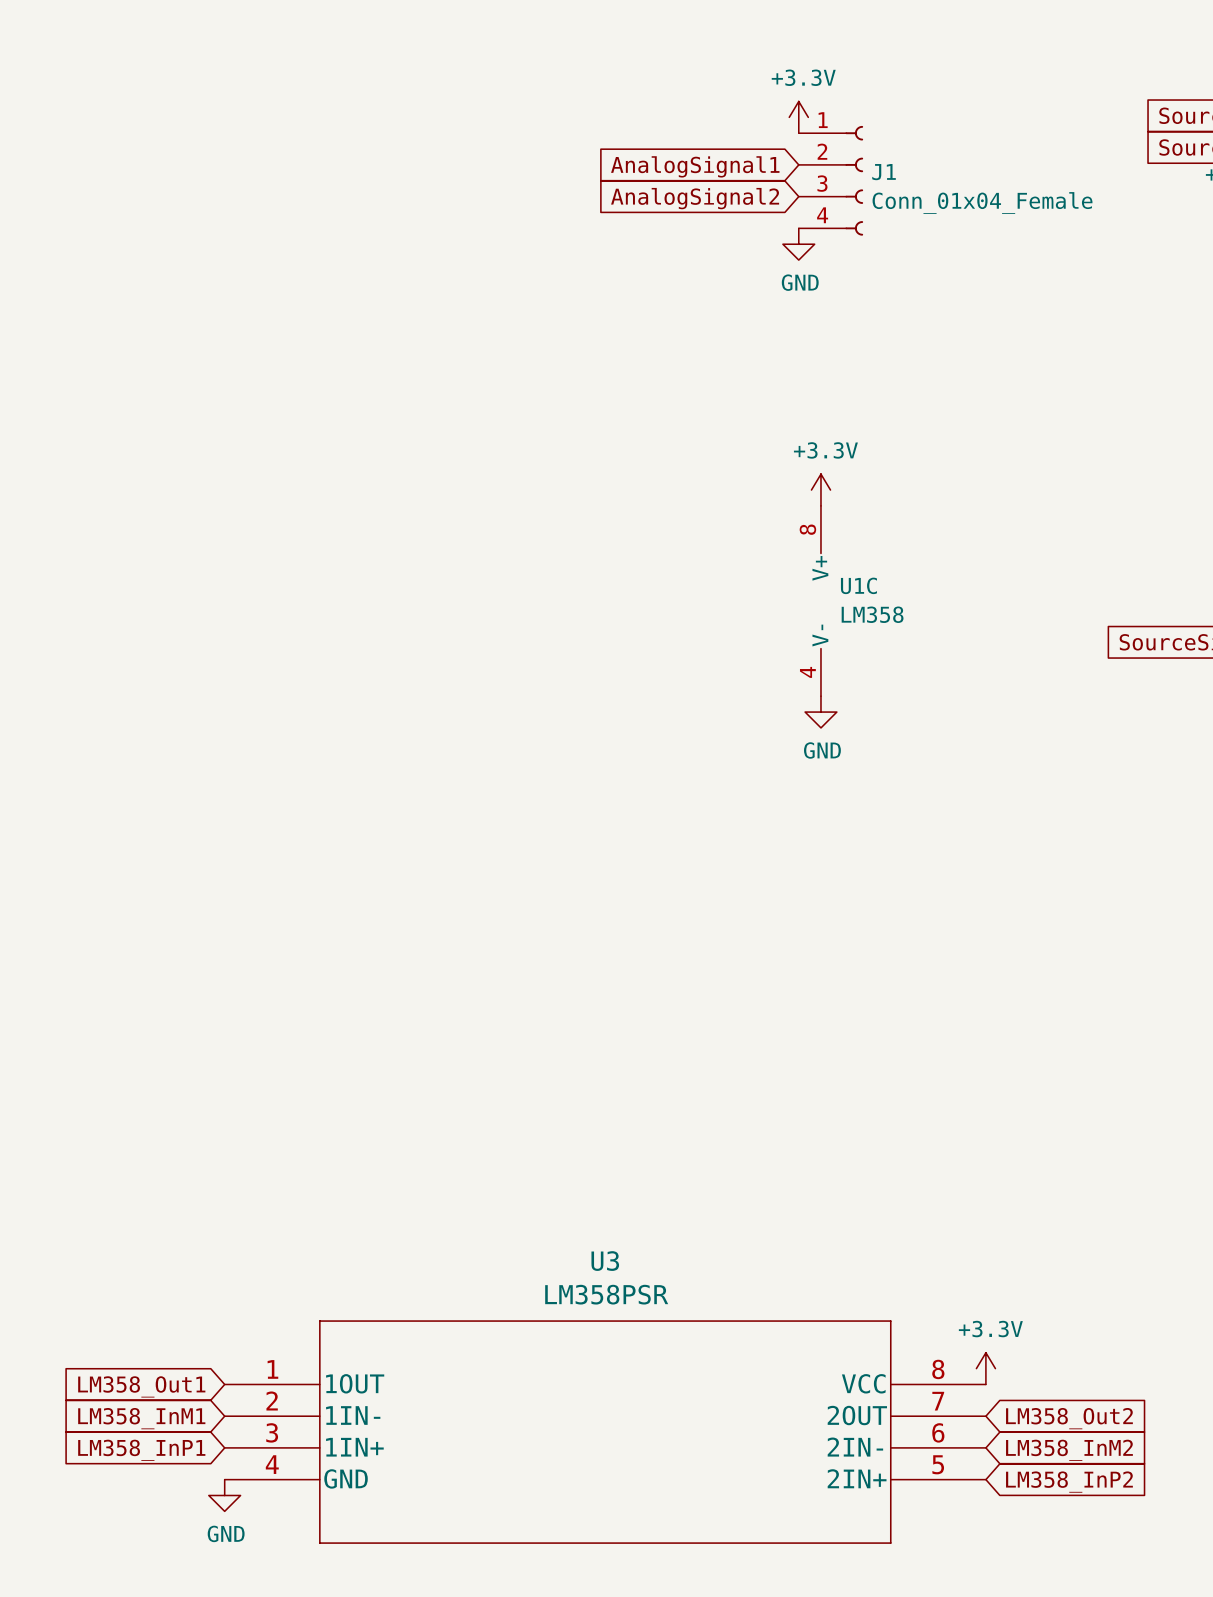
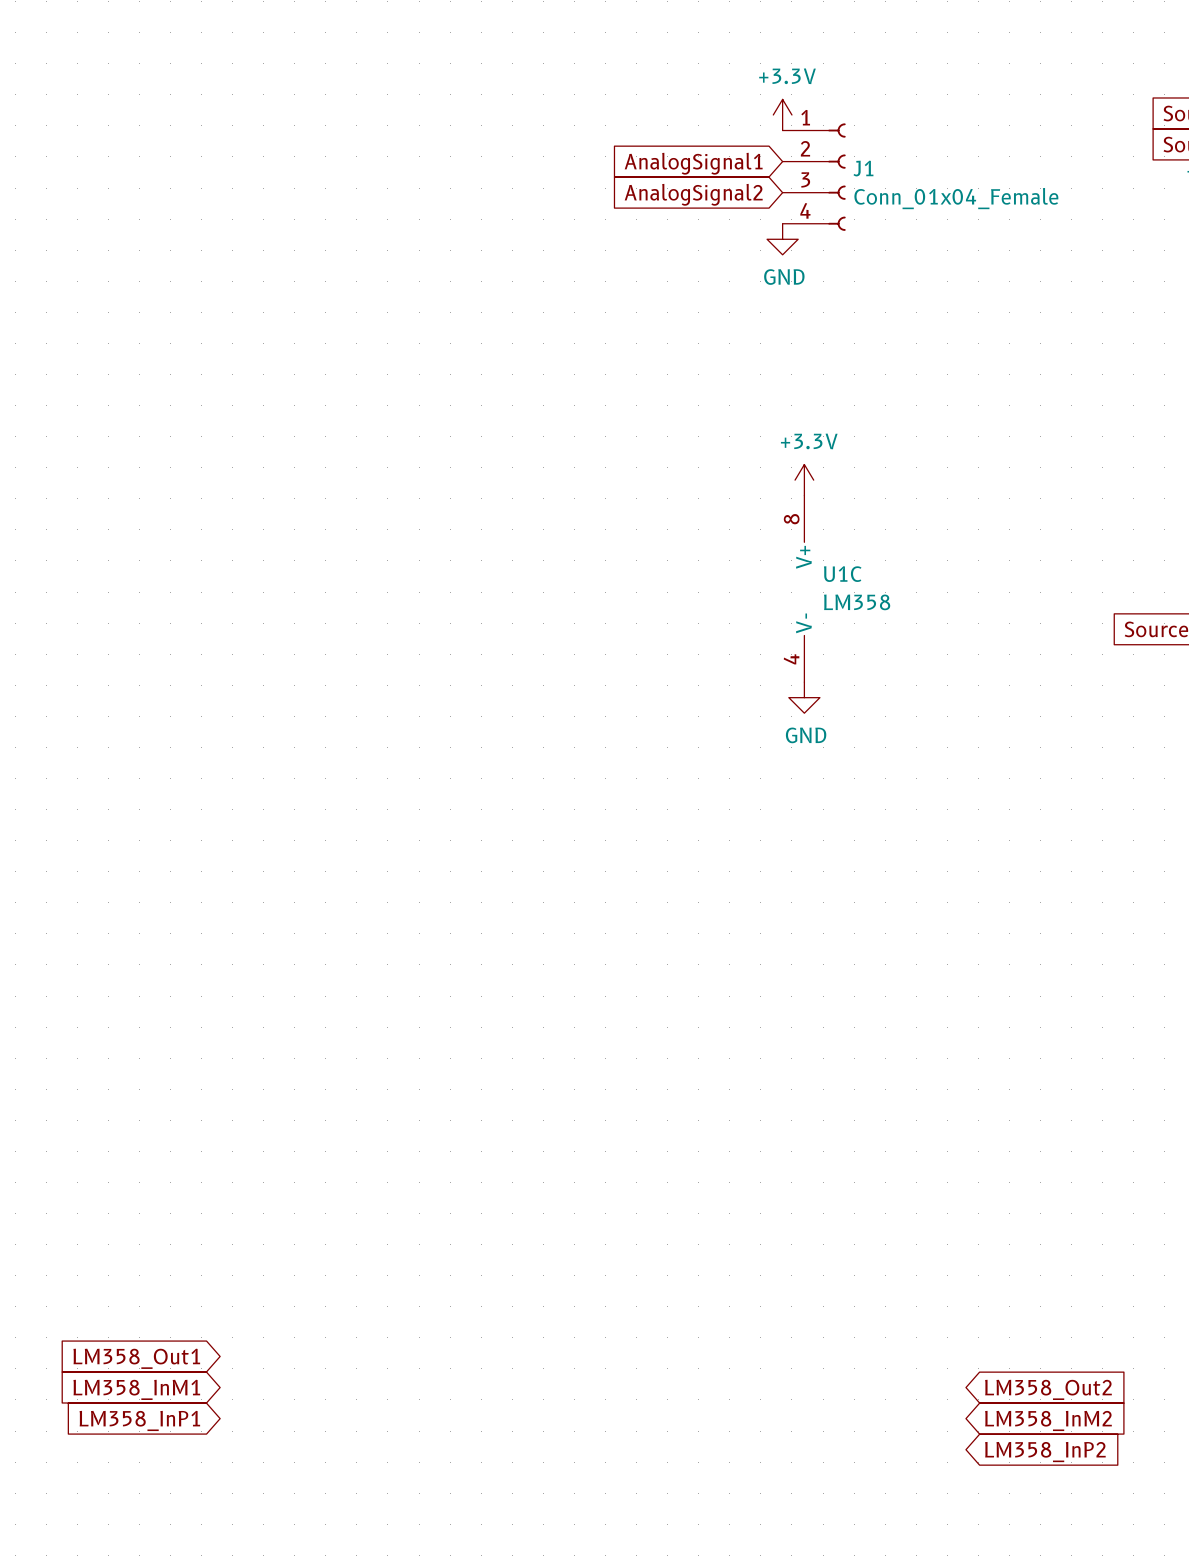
power symbol: +3.3V (985, 1368) -> none
U3: LM358PSR (605, 1432) -> none
power symbol: GND (224, 1495) -> none

